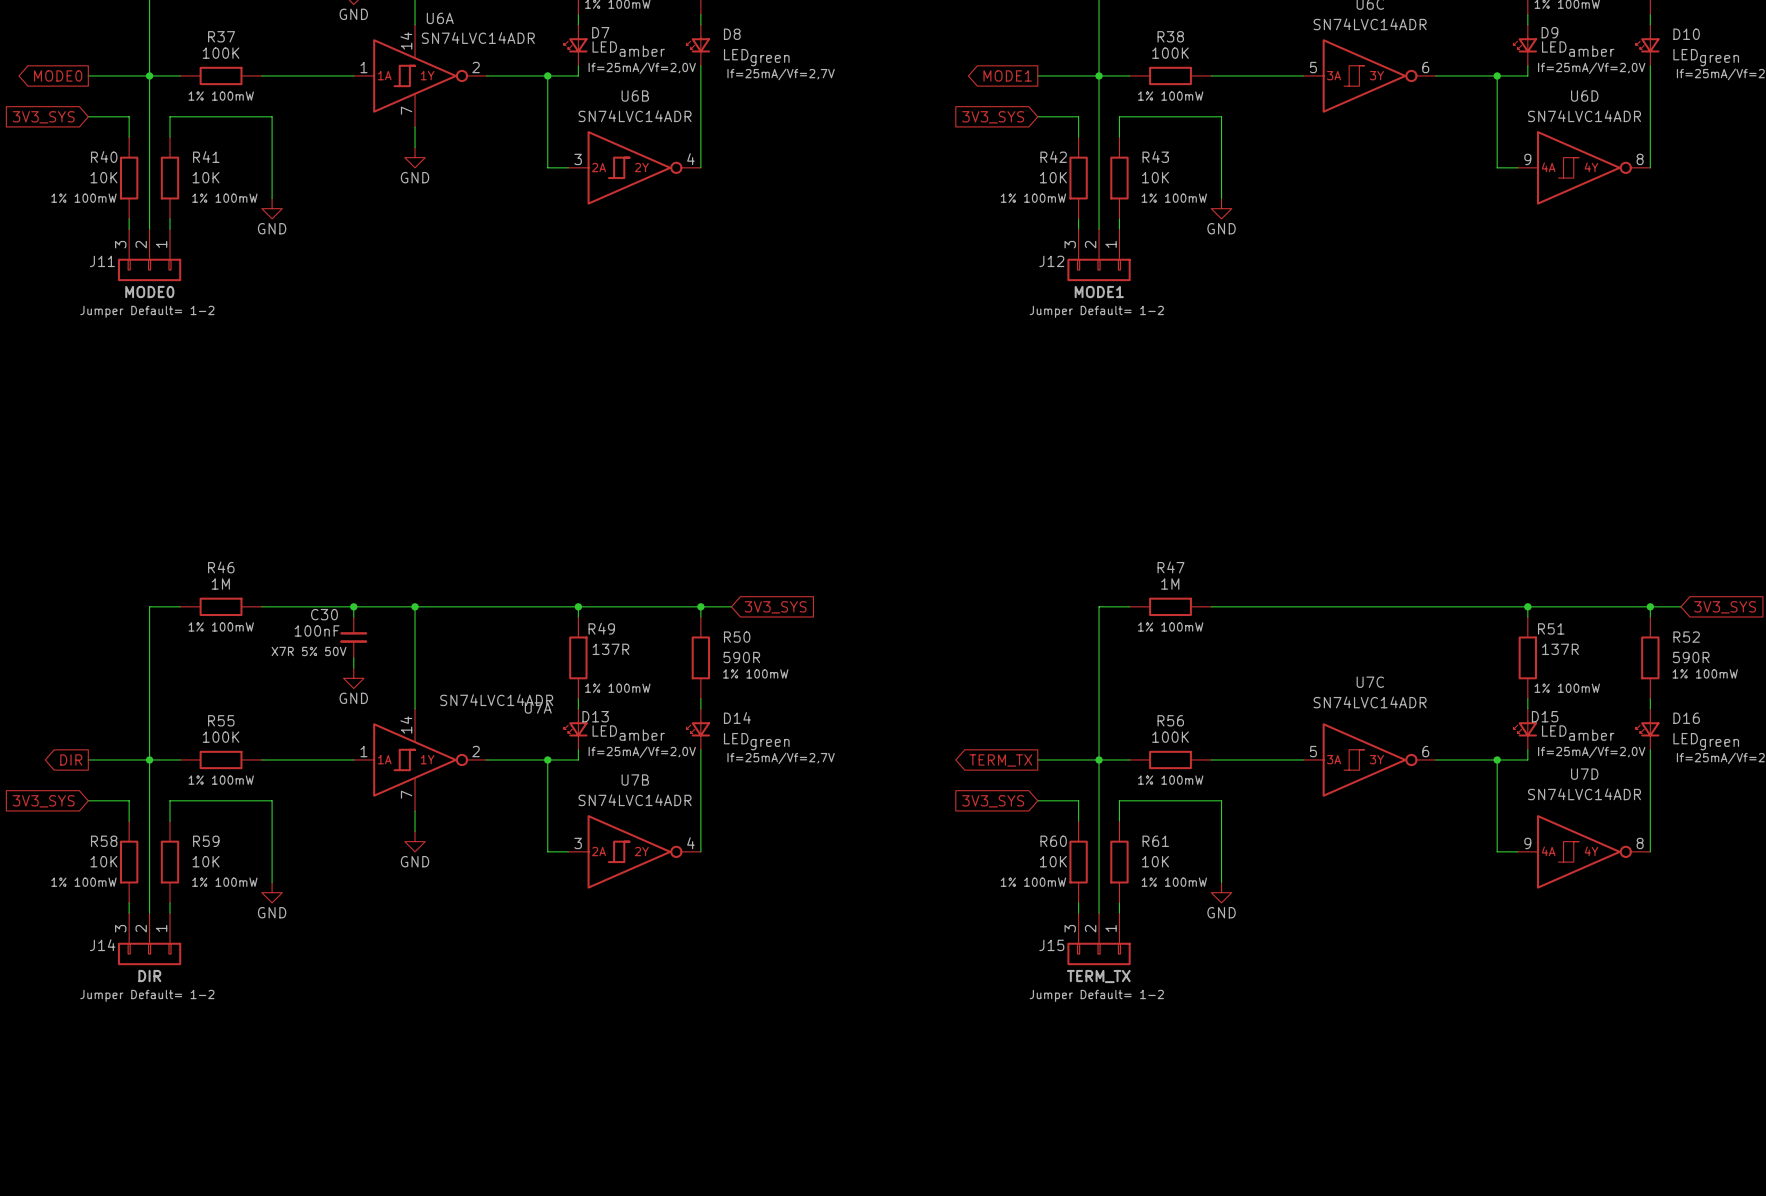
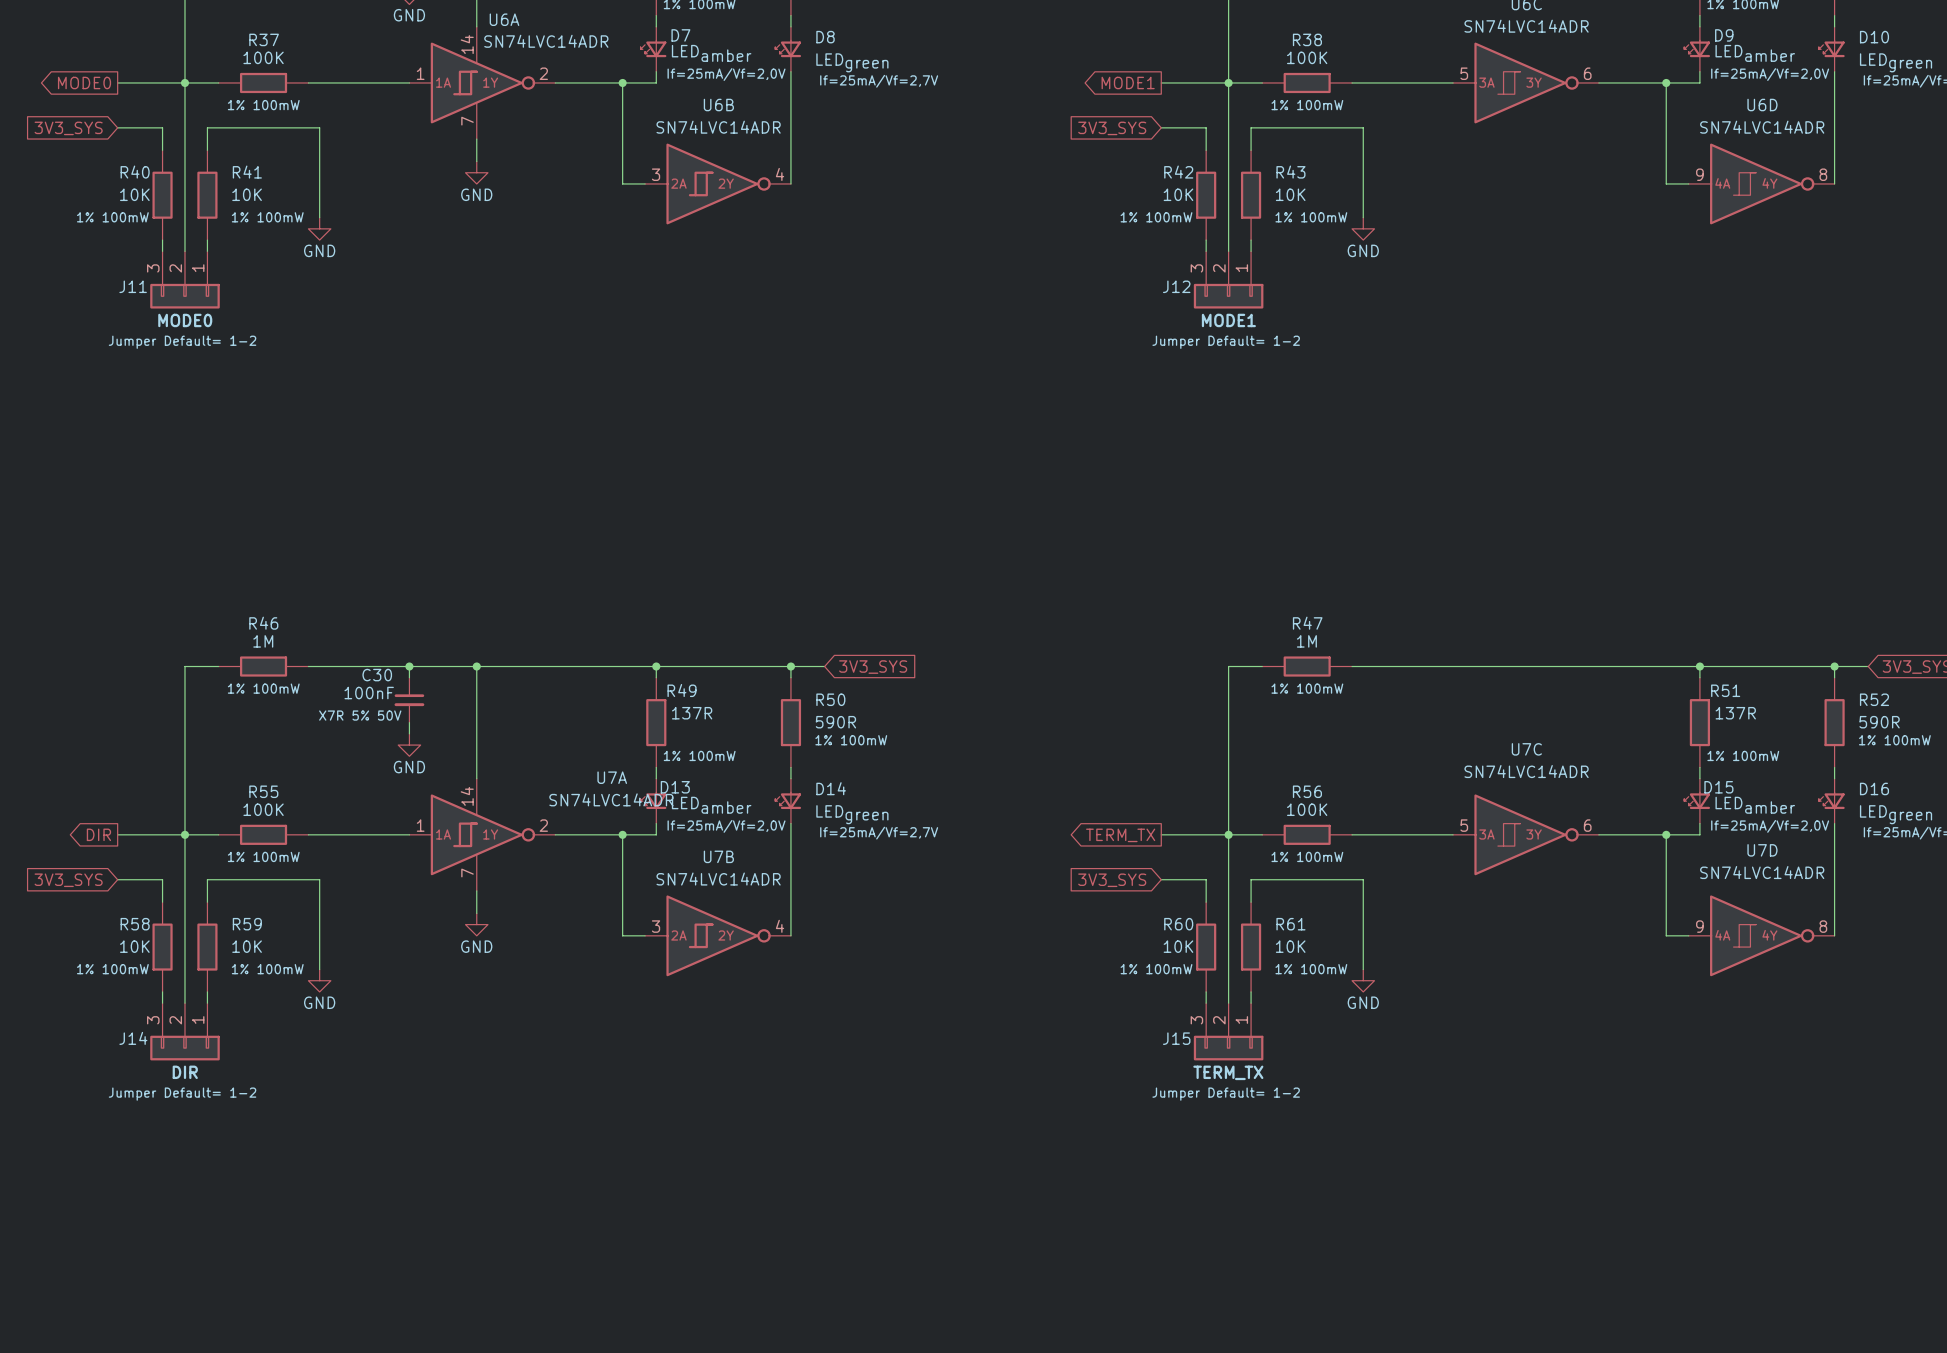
U7A value position: SN74LVC14ADR (496, 700) -> SN74LVC14ADR (611, 799)

